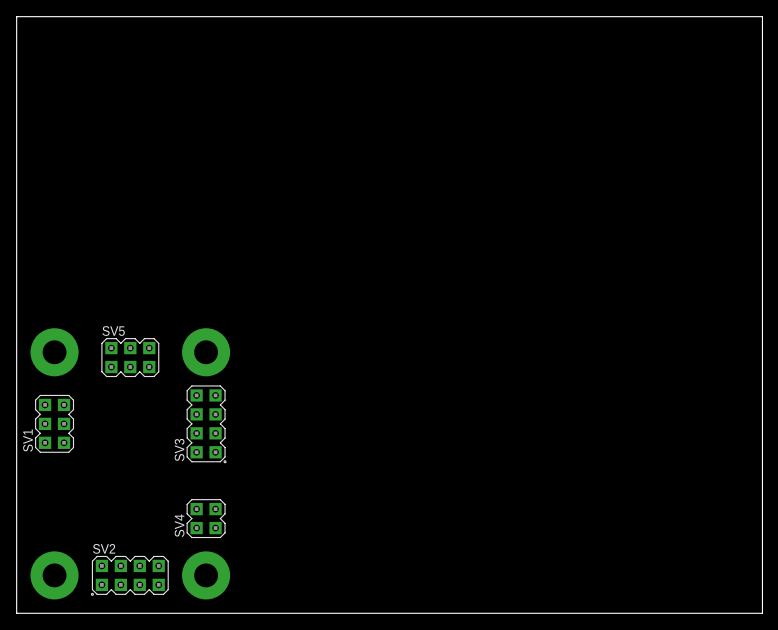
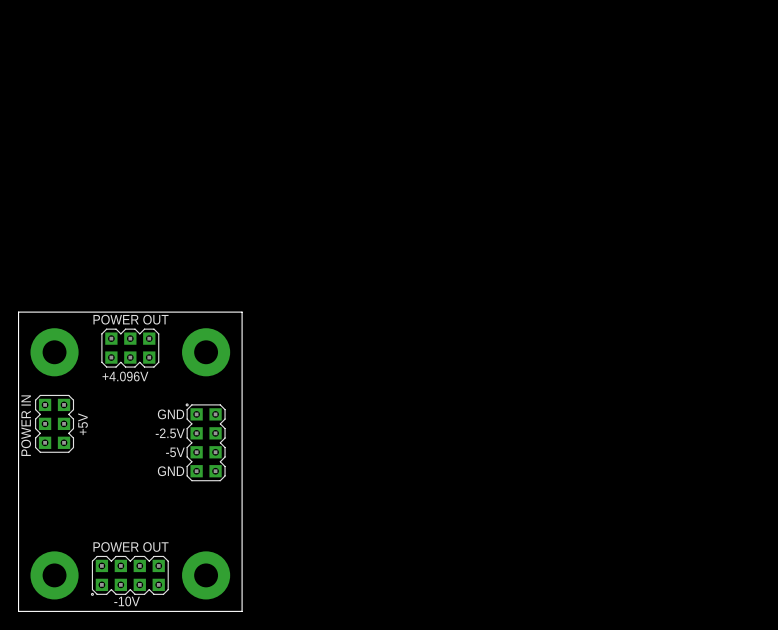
board edge: (16, 16) (762, 16) (762, 613) (16, 613) (16, 16) -> none
board edge: none -> (18, 312) (242, 312) (242, 611) (18, 611) (18, 312)
text: none -> POWER OUT (131, 319)
part: none -> (130, 348)
SV5: (130, 357) -> none
text: none -> +4.096V (125, 376)
text: none -> GND (171, 414)
text: none -> +5V (83, 424)
SV3: (206, 424) -> none
text: none -> POWER IN (26, 425)
text: none -> -2.5V (170, 433)
SV1 name: SV1 (28, 440) -> none
part: none -> (205, 442)
text: none -> -5V (175, 452)
text: none -> GND (171, 471)
SV4: (206, 518) -> none
text: none -> POWER OUT (131, 546)
SV2 name: SV2 (104, 548) -> none
text: none -> -10V (127, 601)

